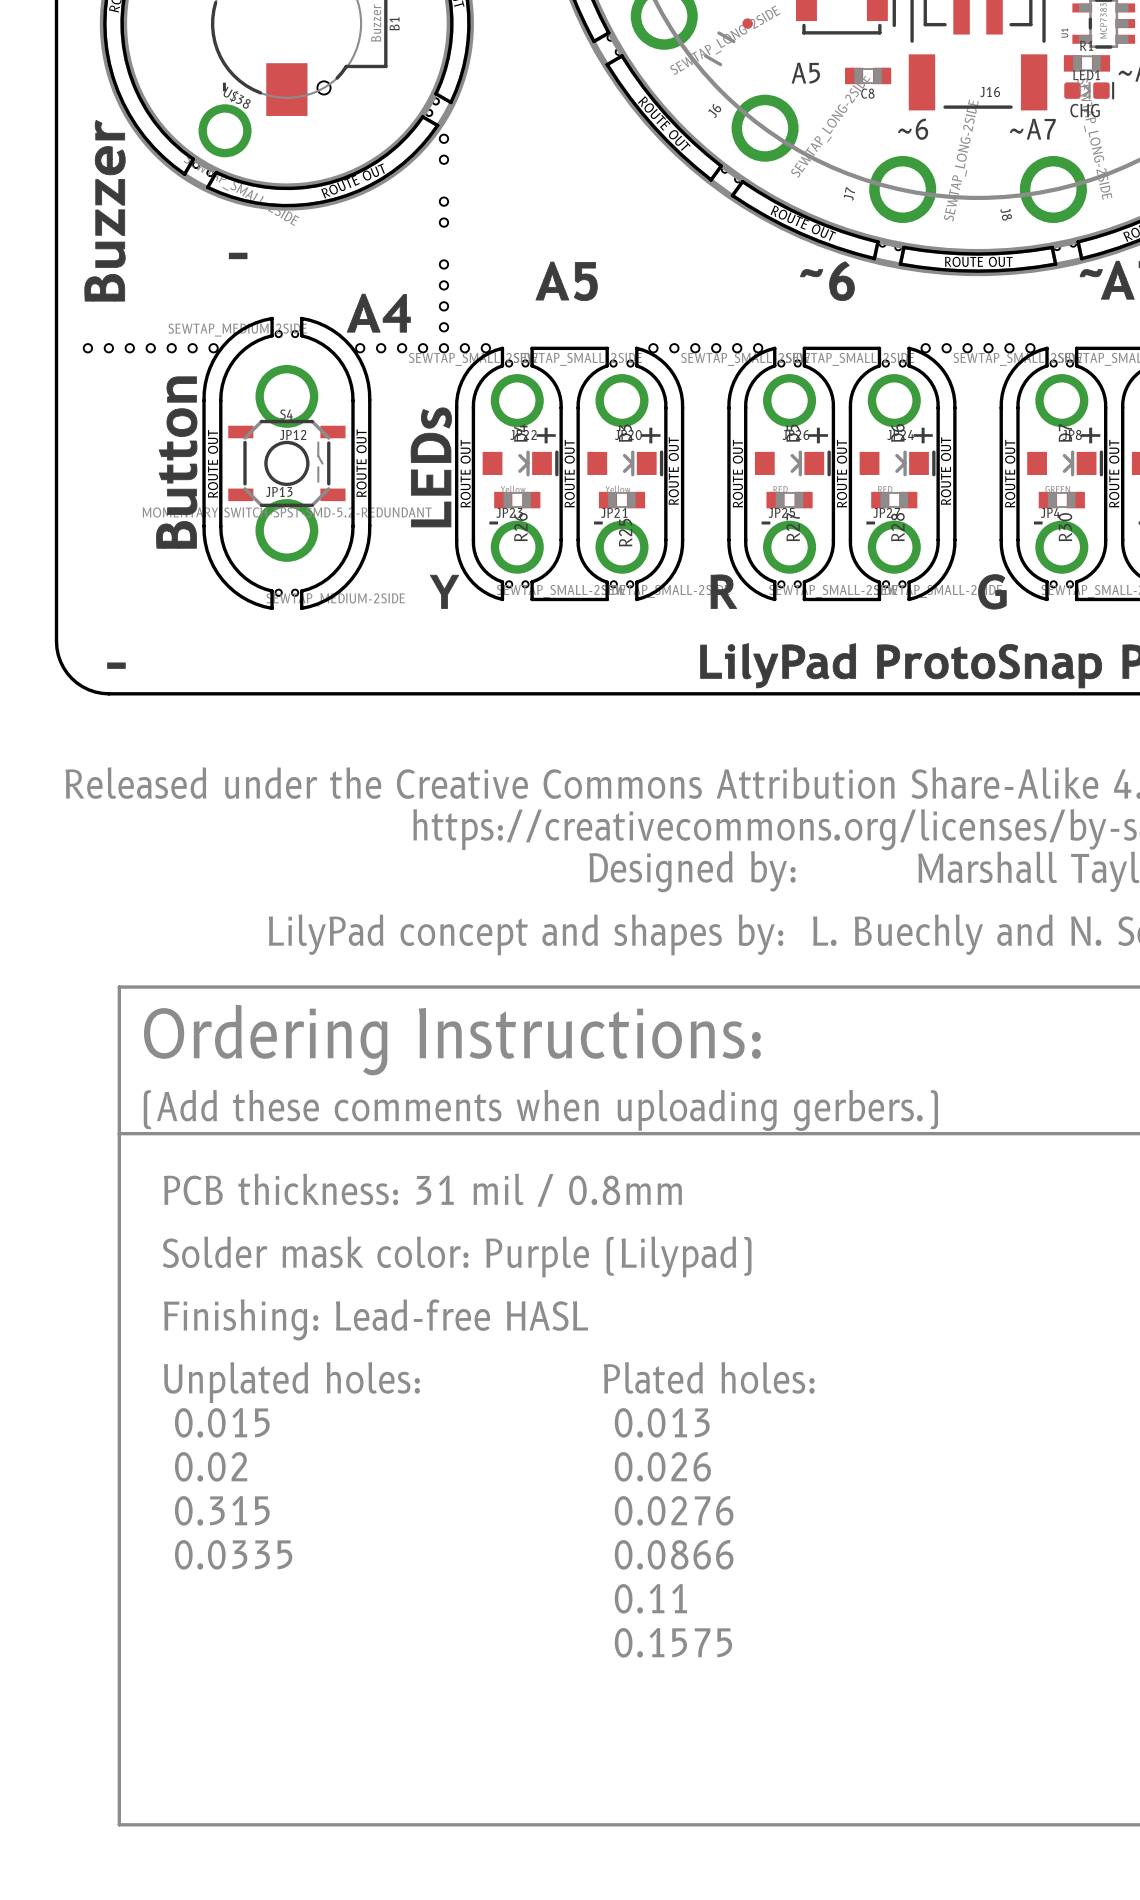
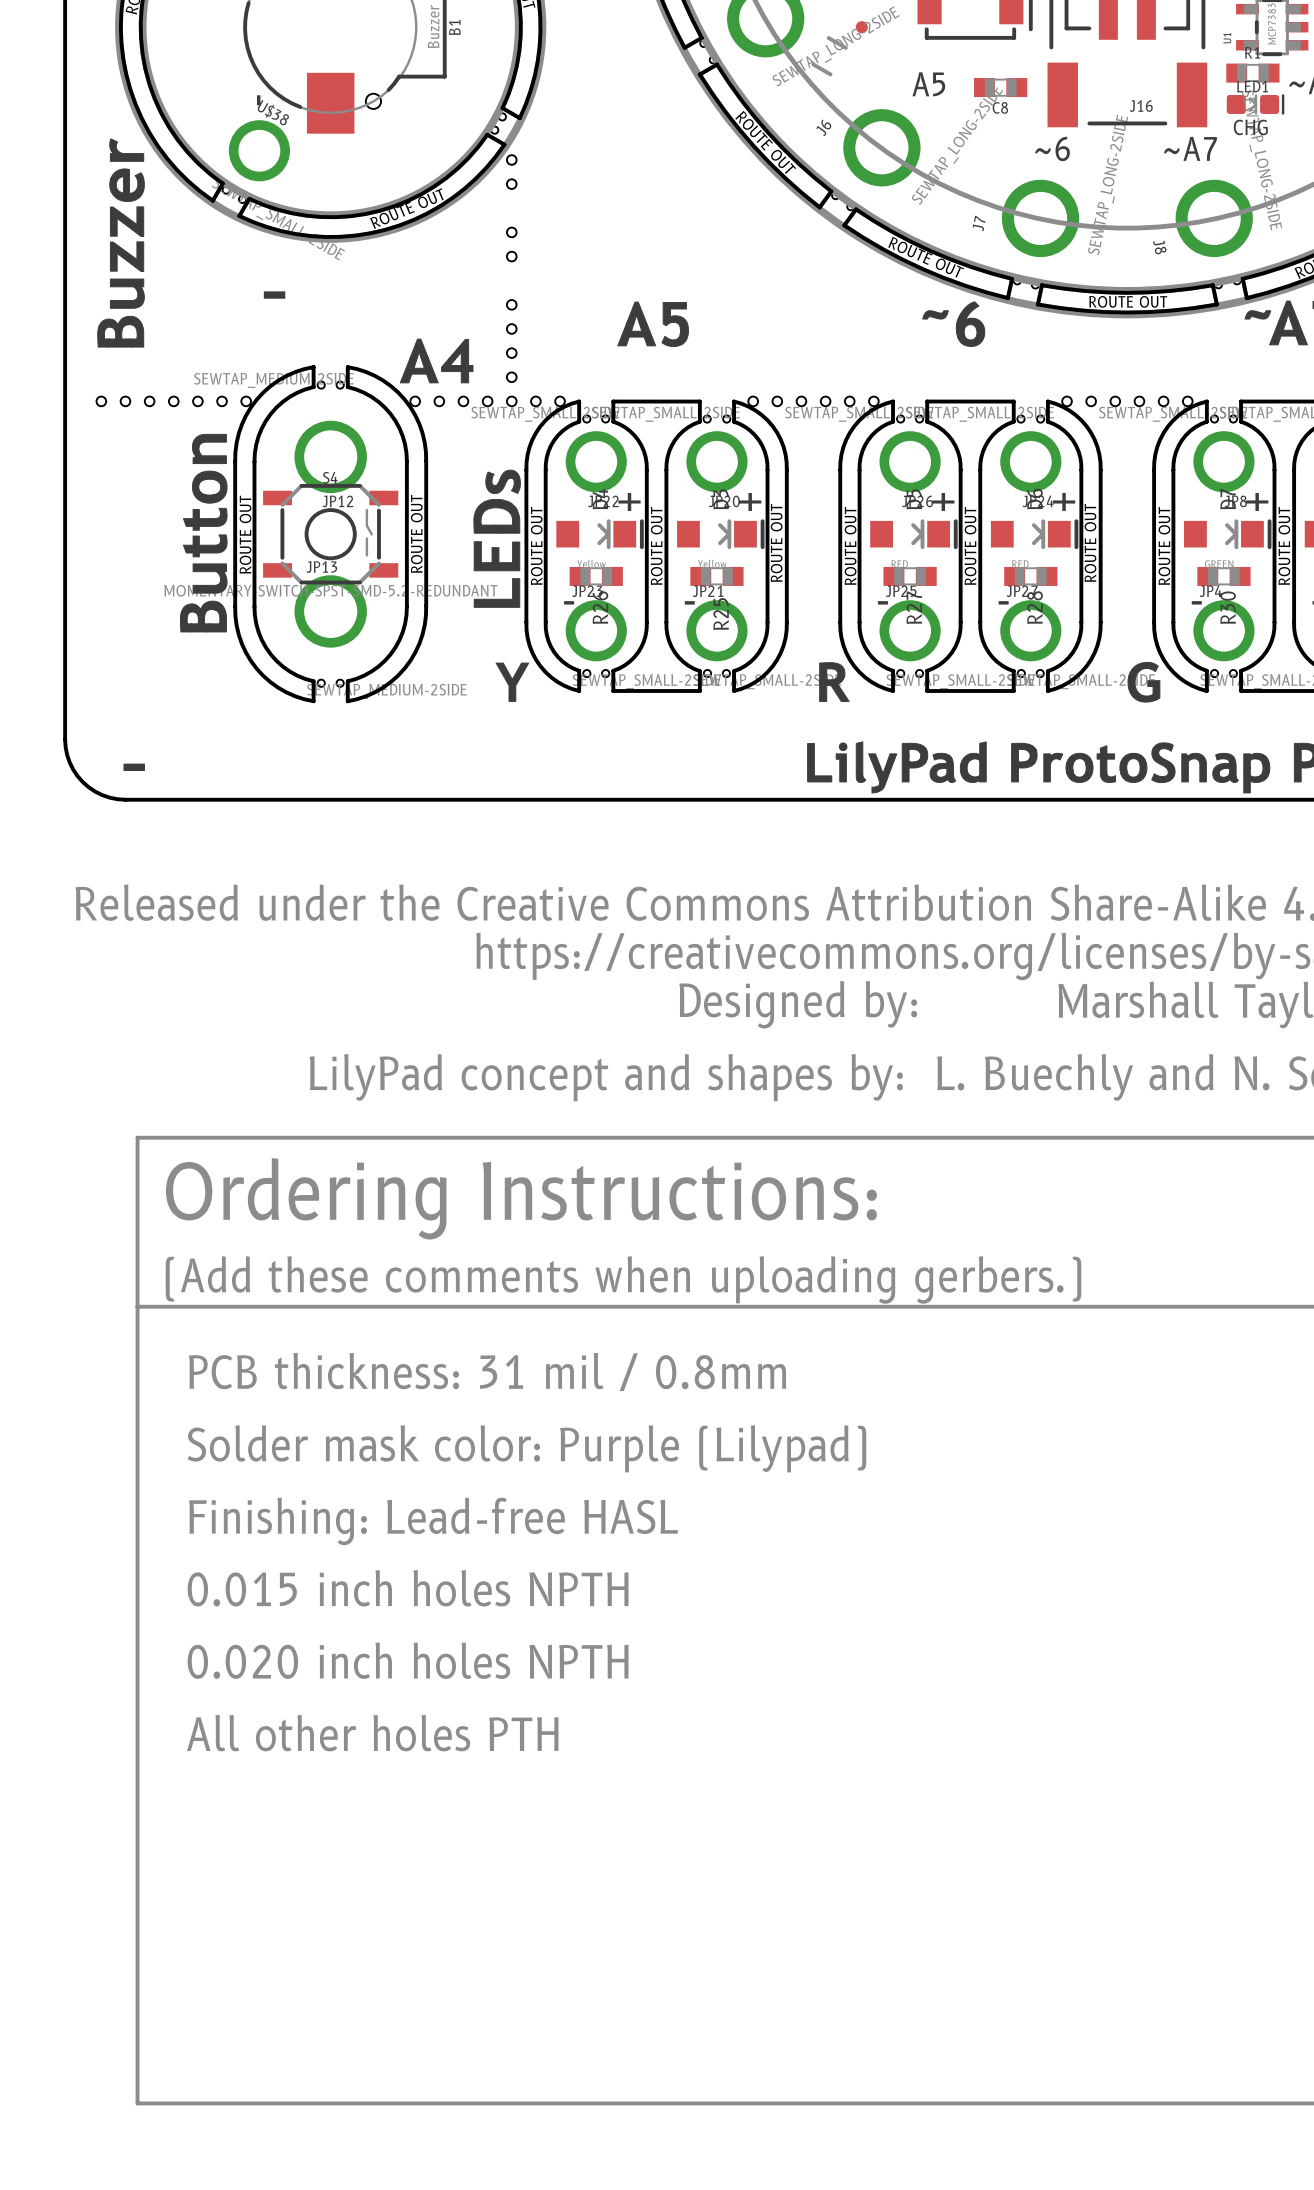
text: Plated holes: (709, 1377) -> none
text: Unplated holes: (291, 1382) -> 0.015 inch holes NPTH (408, 1588)
text: 0.015 (222, 1422) -> none
text: 0.013 (662, 1422) -> none
text: none -> 0.020 inch holes NPTH (408, 1660)
text: 0.02 (211, 1466) -> none
text: 0.026 (662, 1466) -> none
text: 0.315 (222, 1510) -> All other holes PTH (372, 1733)
text: 0.0276 (674, 1510) -> none
text: 0.0335 (233, 1554) -> none
text: 0.0866 (674, 1554) -> none
text: 0.11 (650, 1598) -> none
text: 0.1575 (673, 1642) -> none

